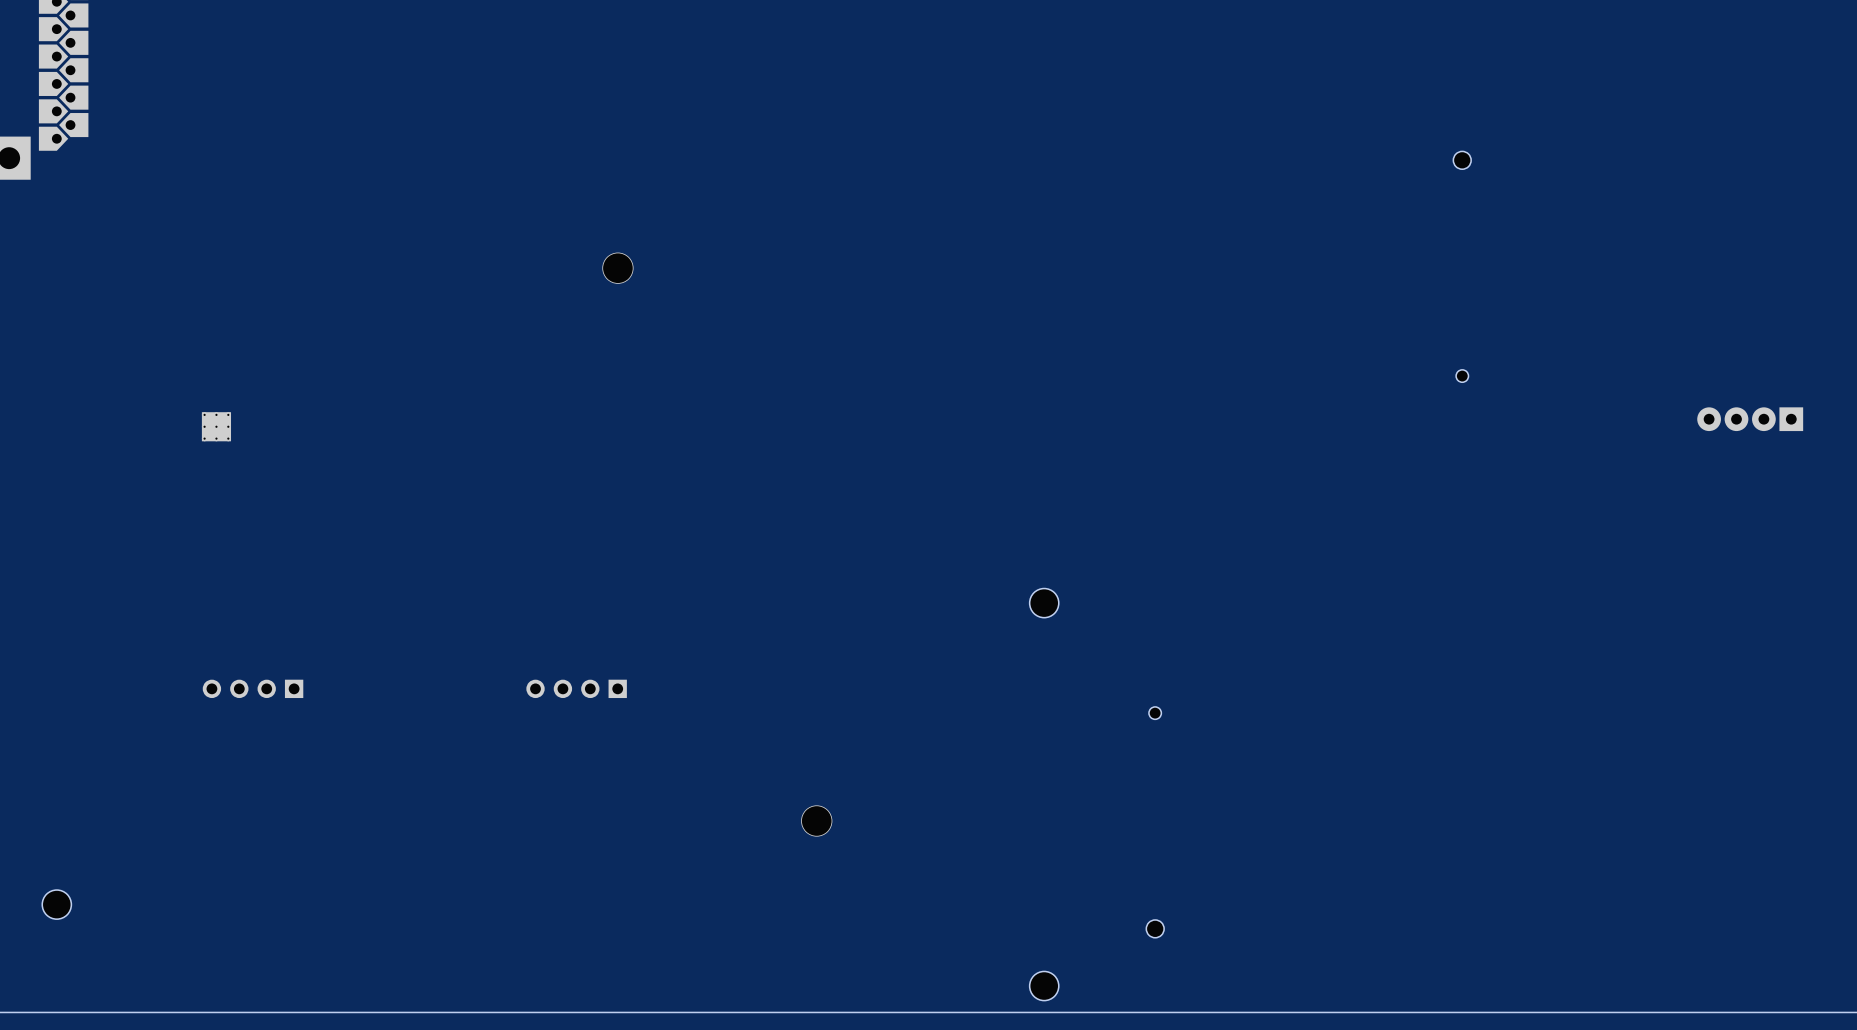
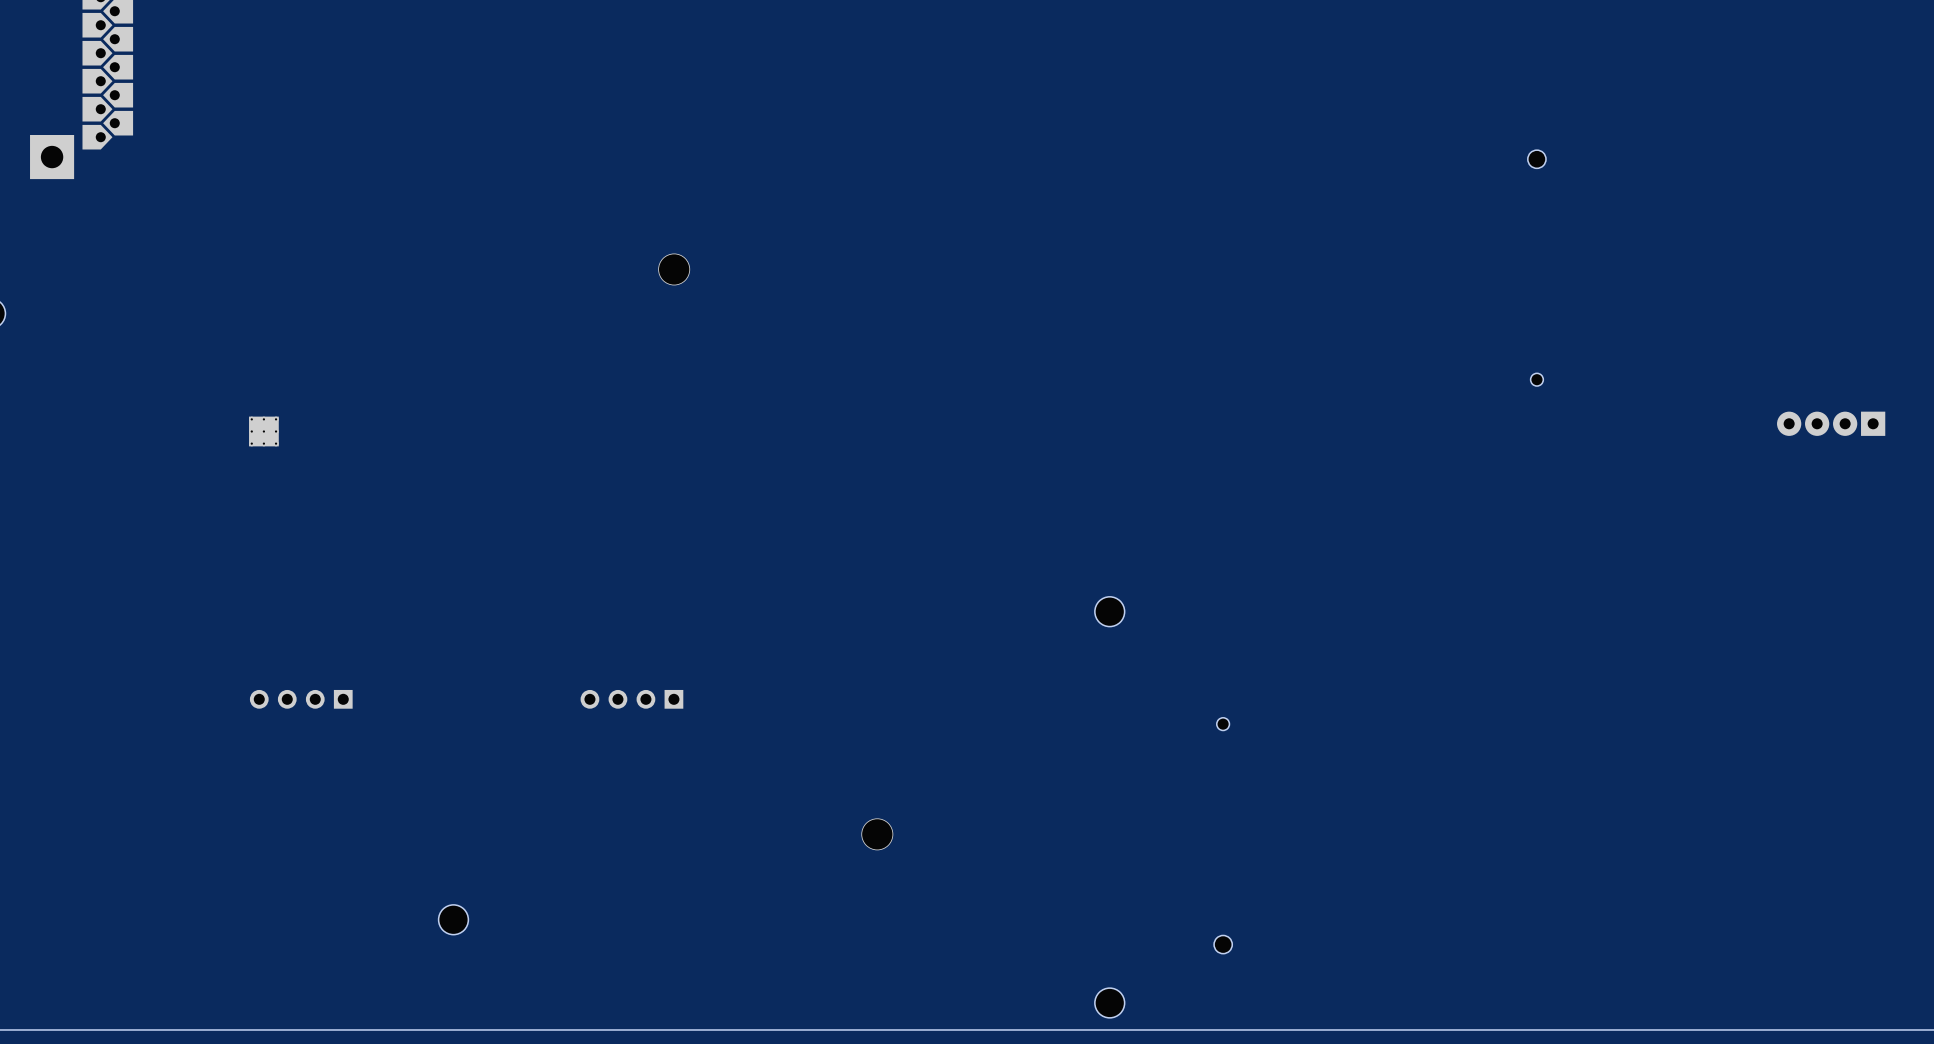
part: (56, 904) -> none
part: none -> (453, 919)

